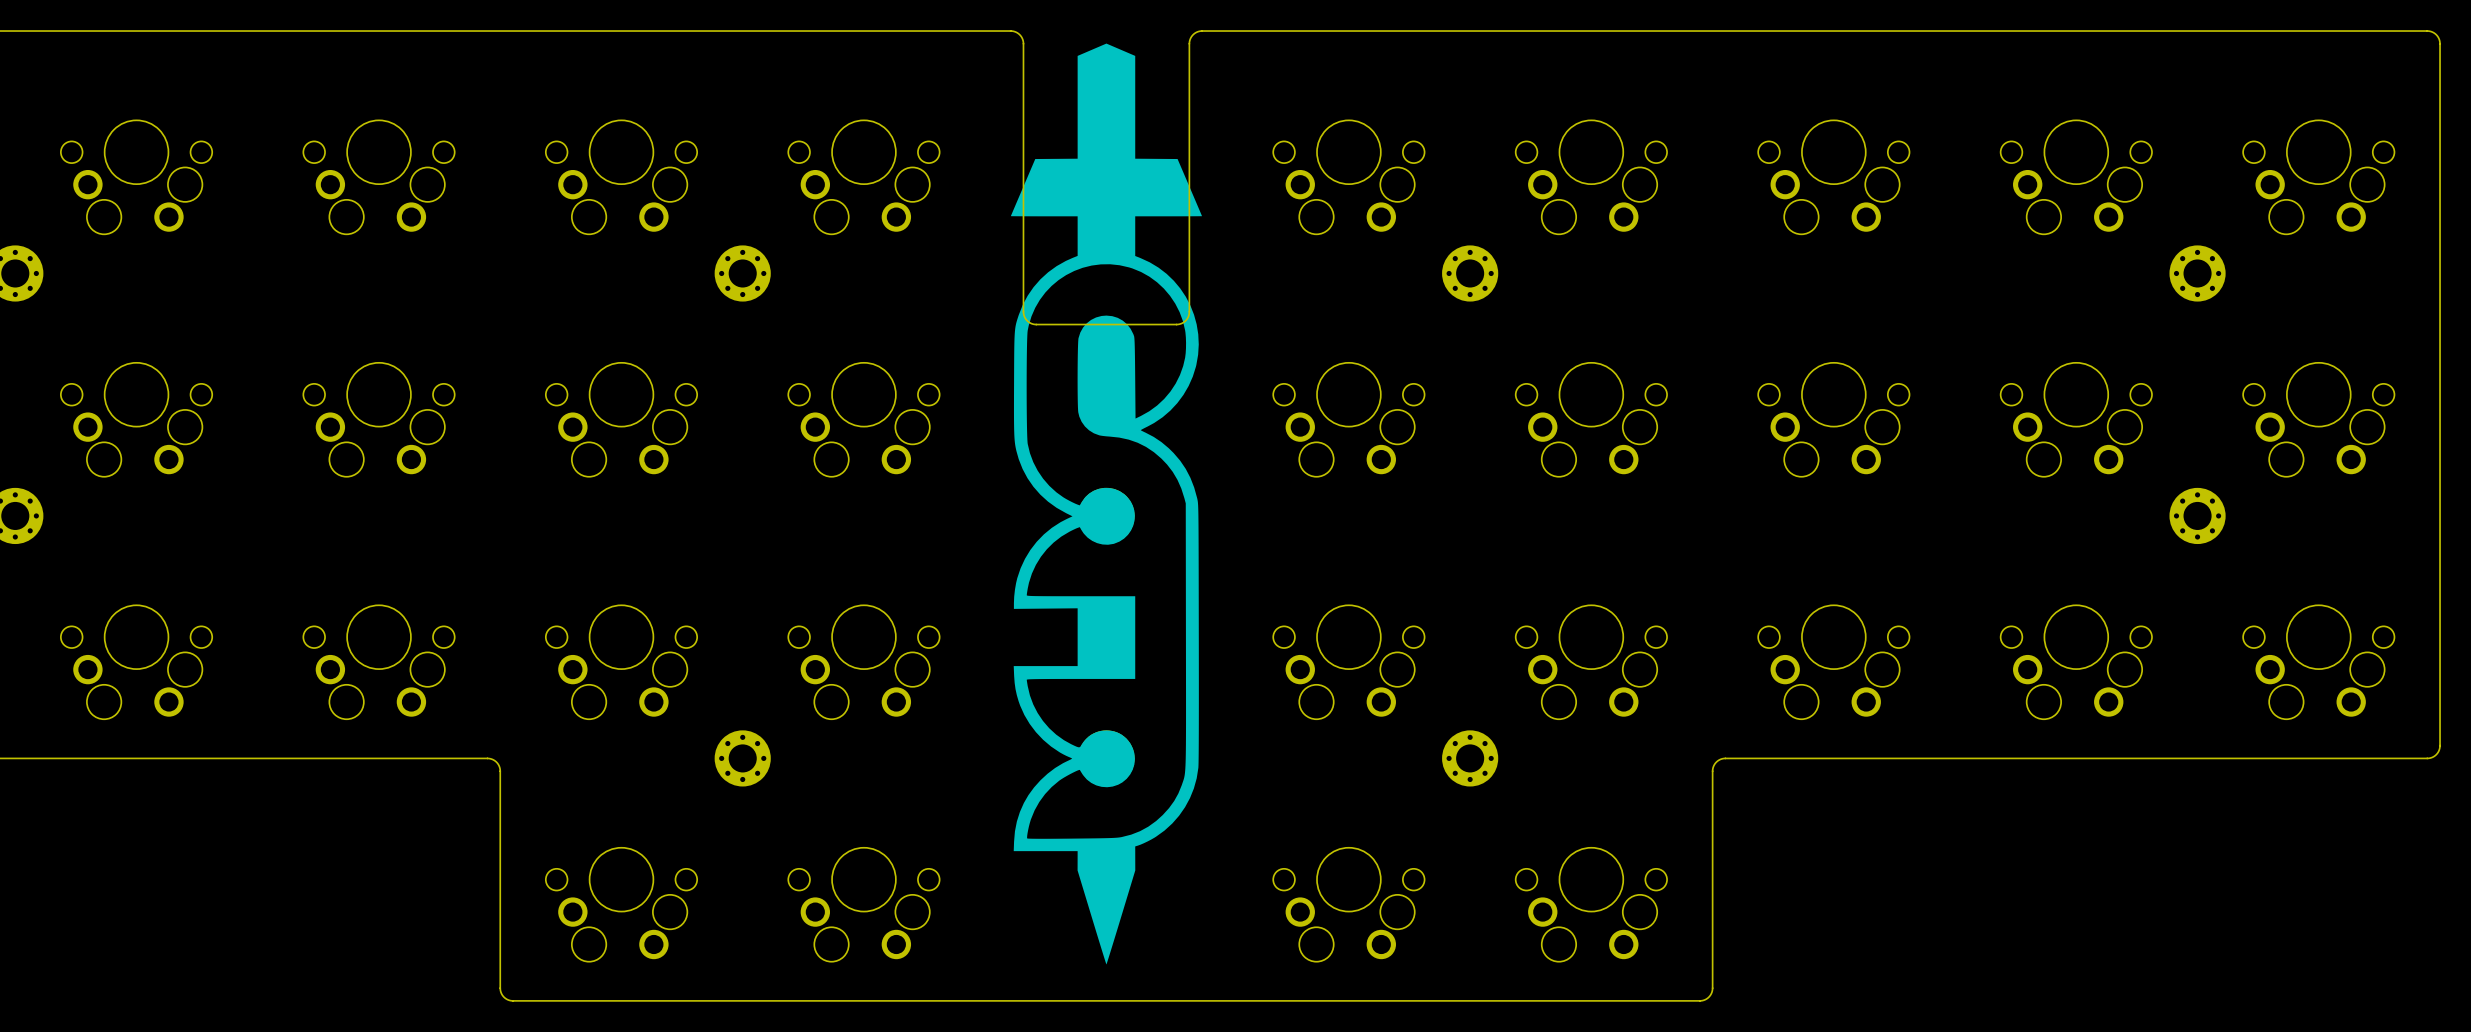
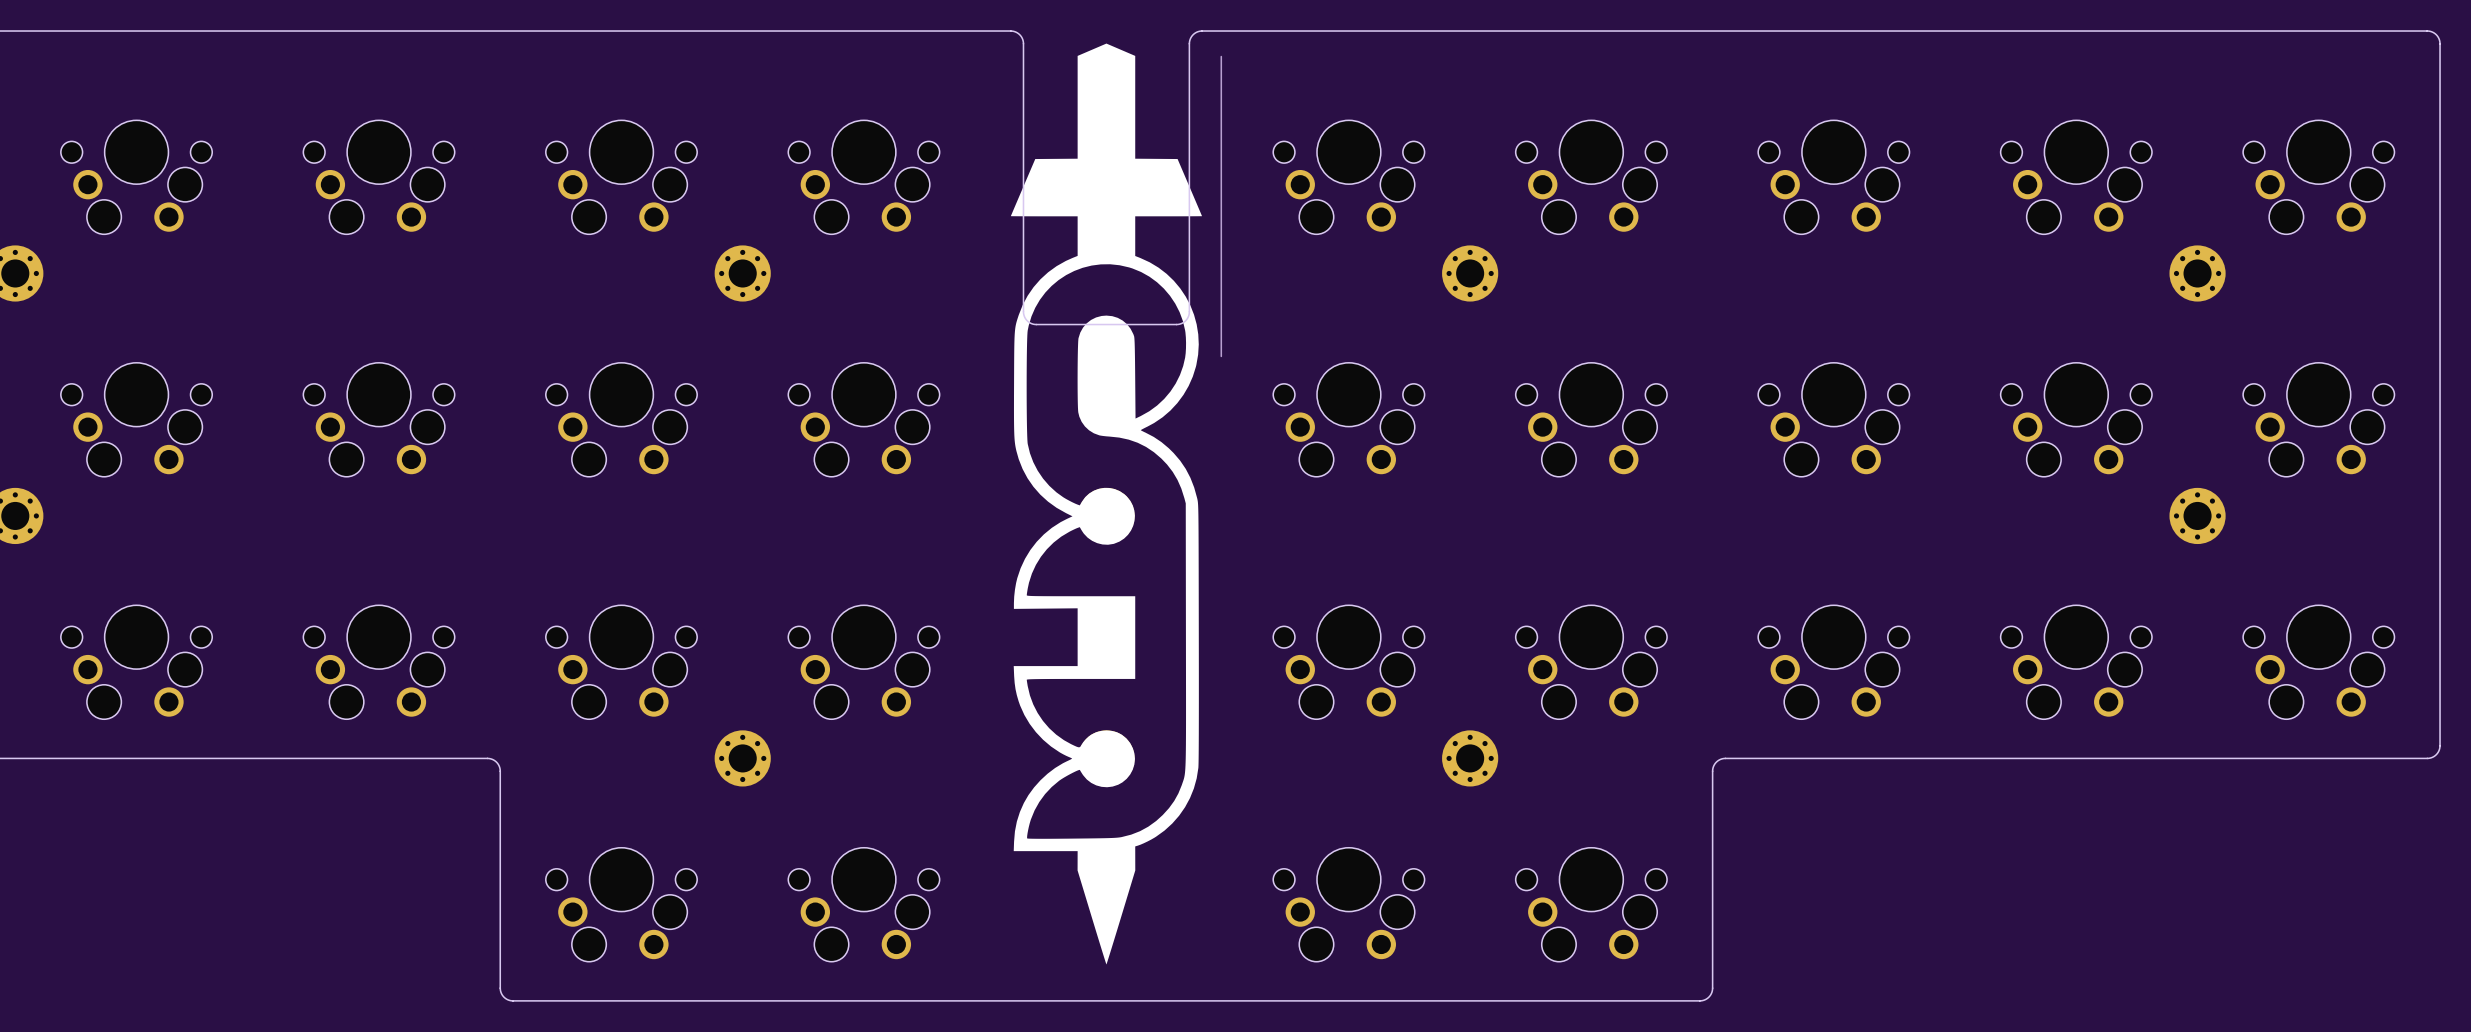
part: none -> (1221, 206)

